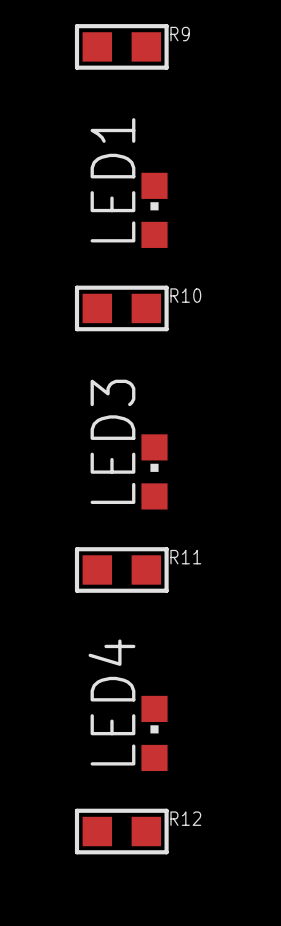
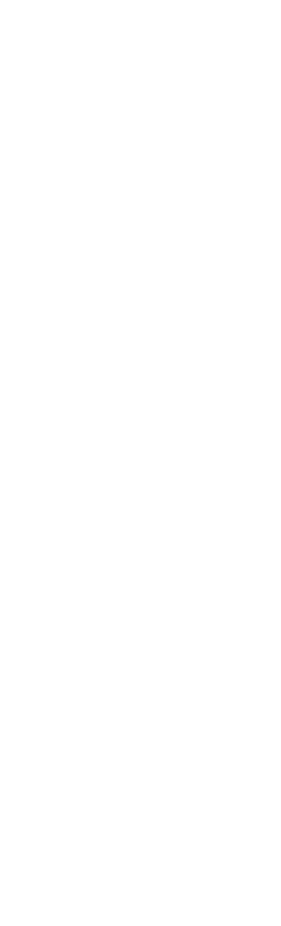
R9: (121, 46) -> none
LED1: (154, 210) -> none
R10: (121, 308) -> none
LED3: (154, 471) -> none
R11: (121, 569) -> none
LED4: (154, 733) -> none
R12: (121, 831) -> none

